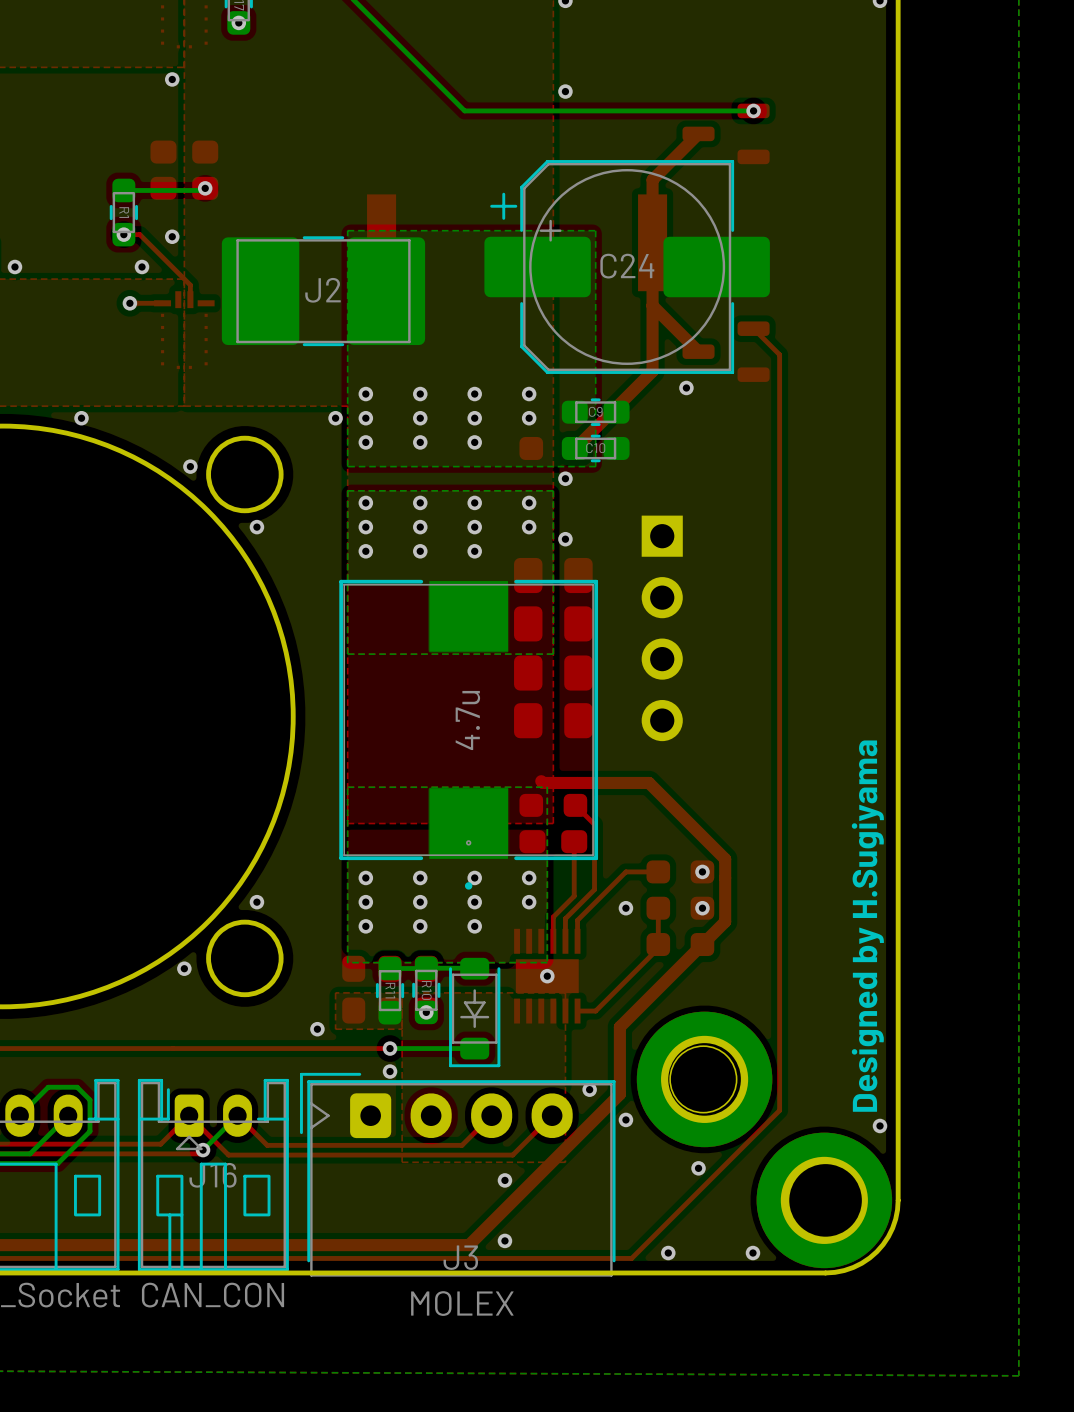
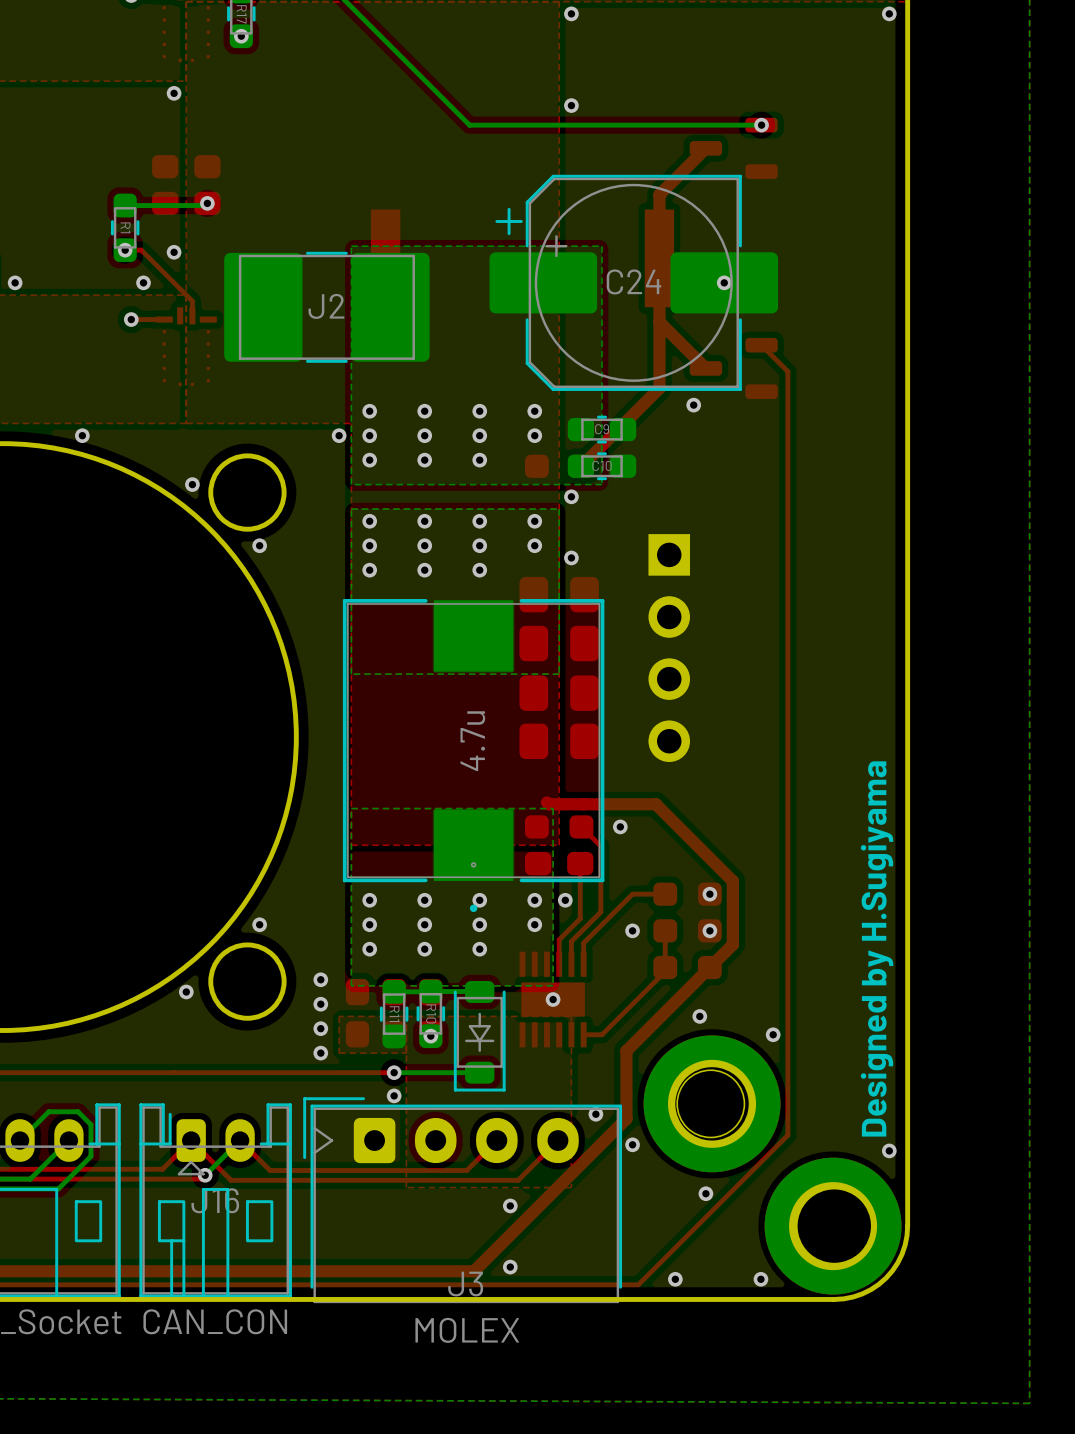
via: none -> (724, 282)
via: none -> (620, 826)
via: none -> (565, 900)
via: none -> (320, 979)
via: none -> (320, 1004)
via: none -> (699, 1016)
via: none -> (320, 1028)
via: none -> (773, 1034)

